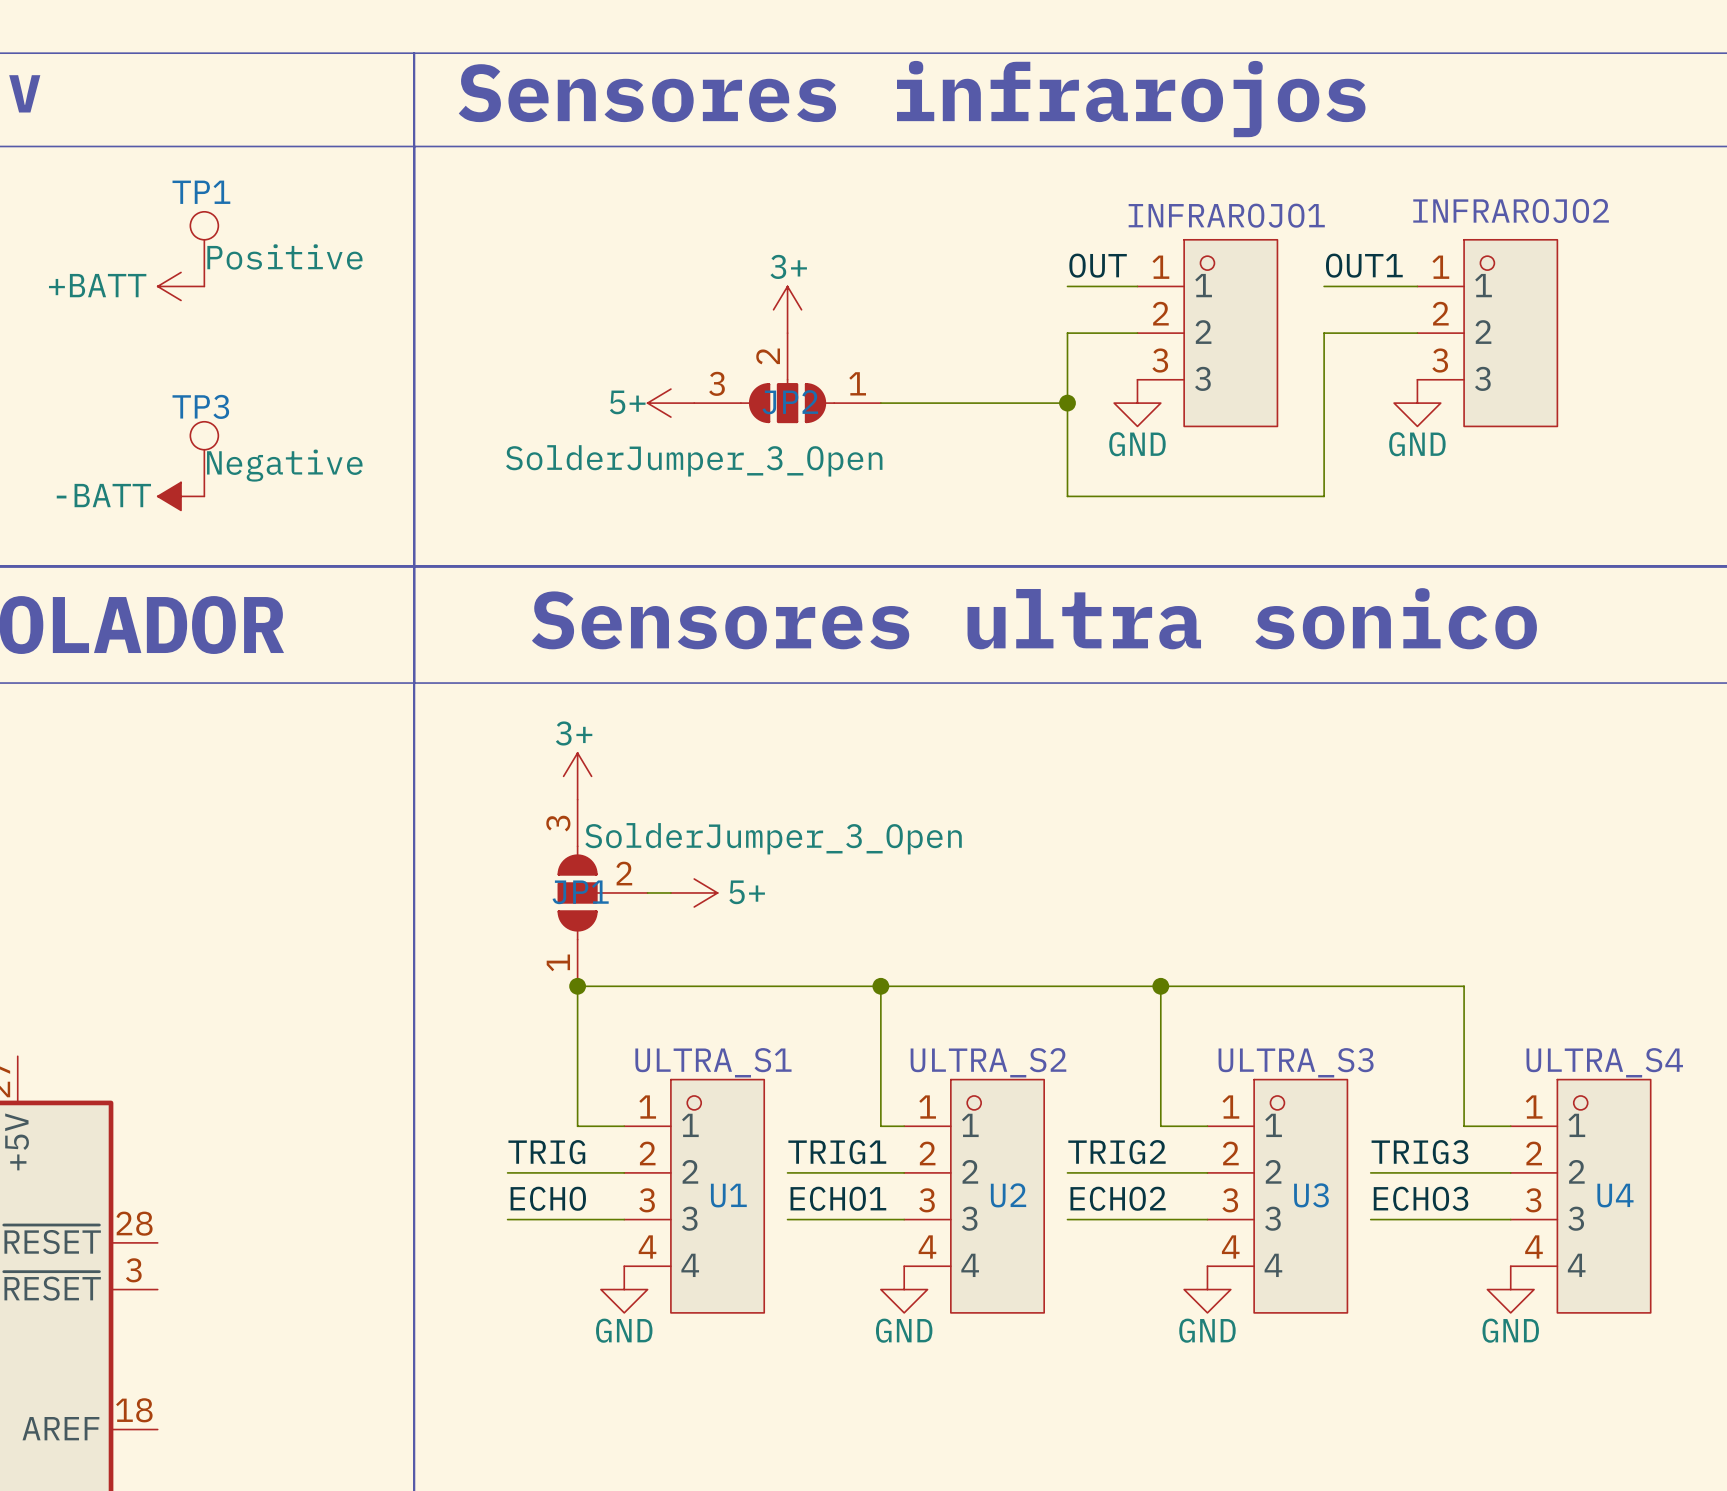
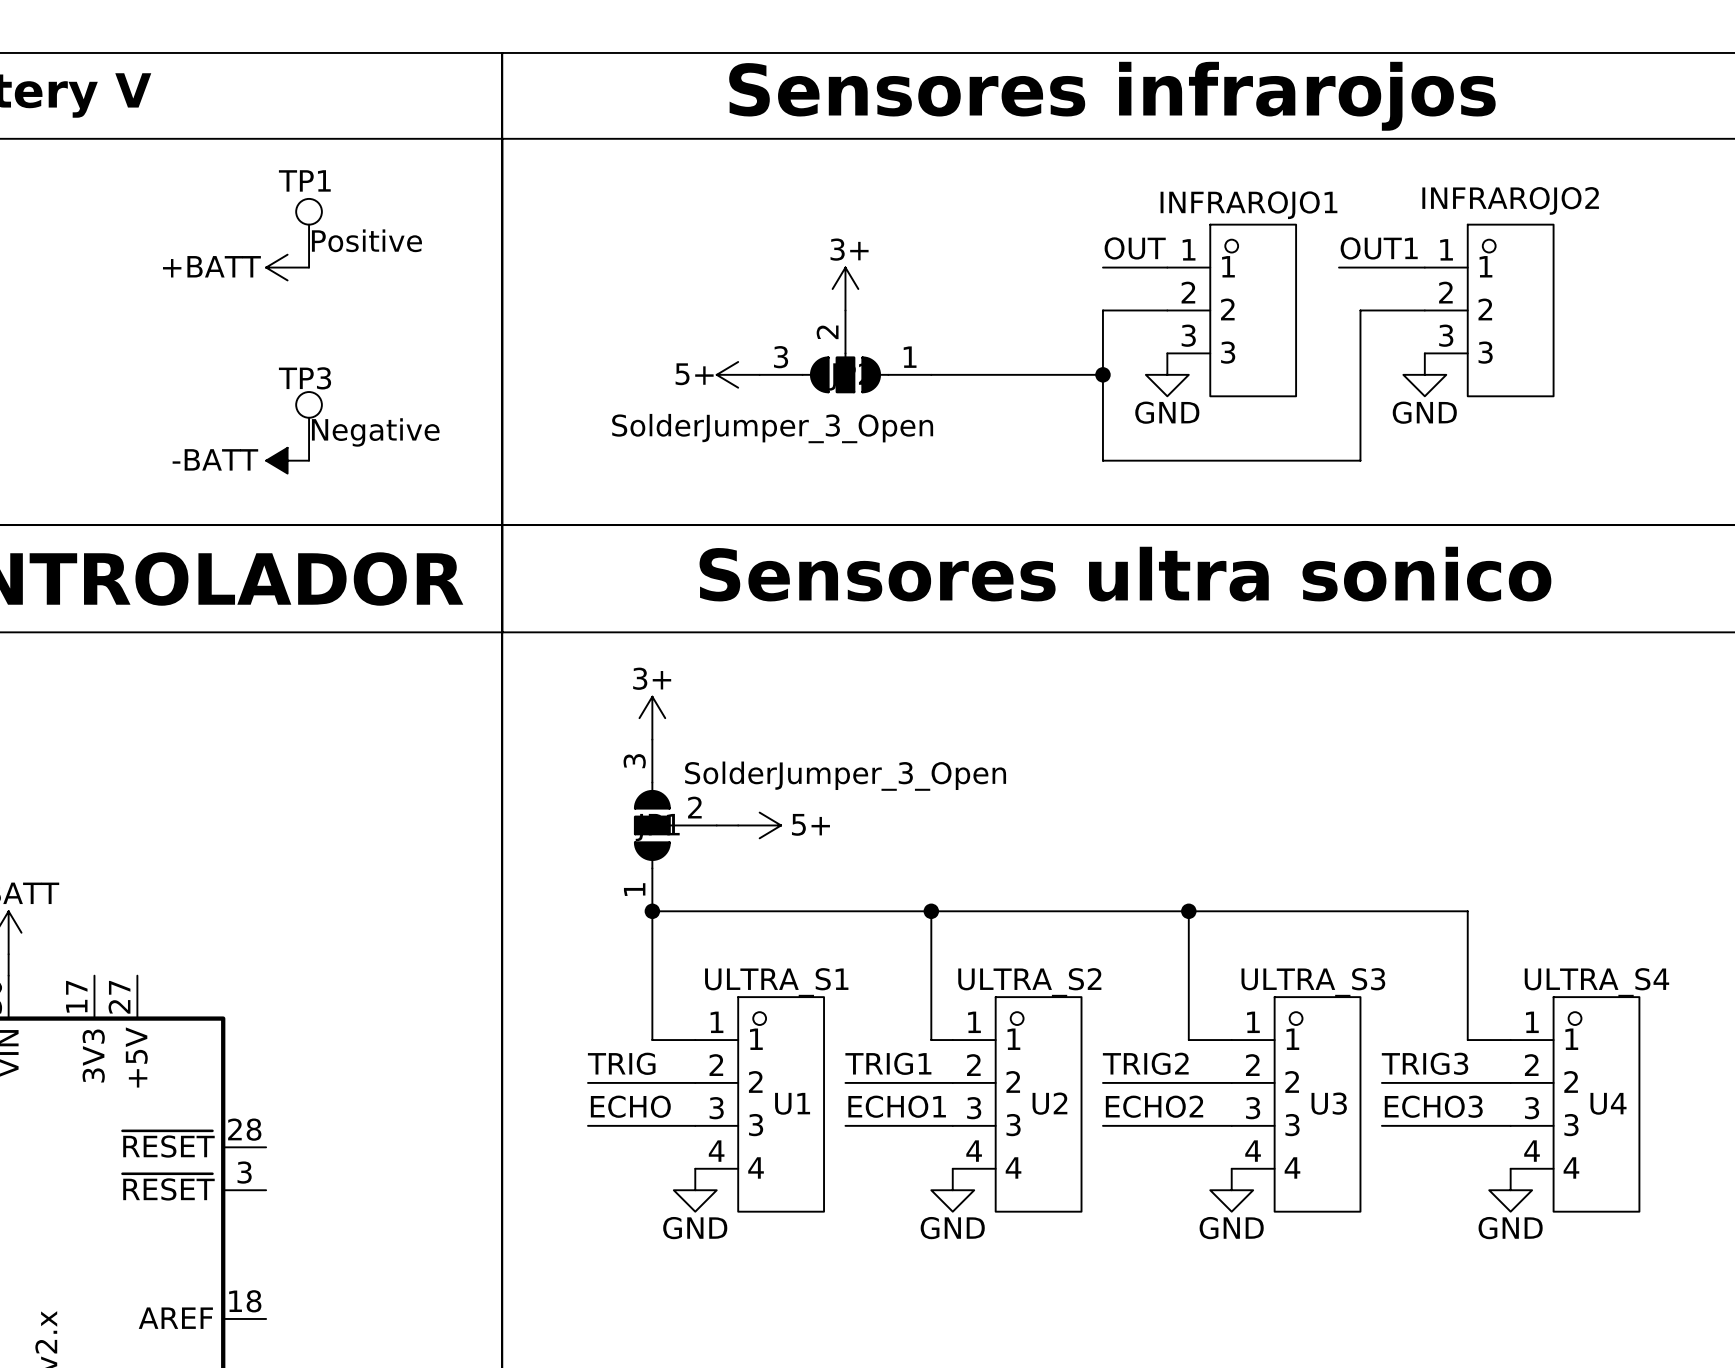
text position: Sensores infrarojos (912, 99) -> Sensores infrarojos (1112, 96)
wire: (1347, 333) (1324, 333) (1324, 496) -> (1360, 310) (1360, 460) (1339, 460)
text position: Sensores ultra sonico (1034, 618) -> Sensores ultra sonico (1125, 574)

